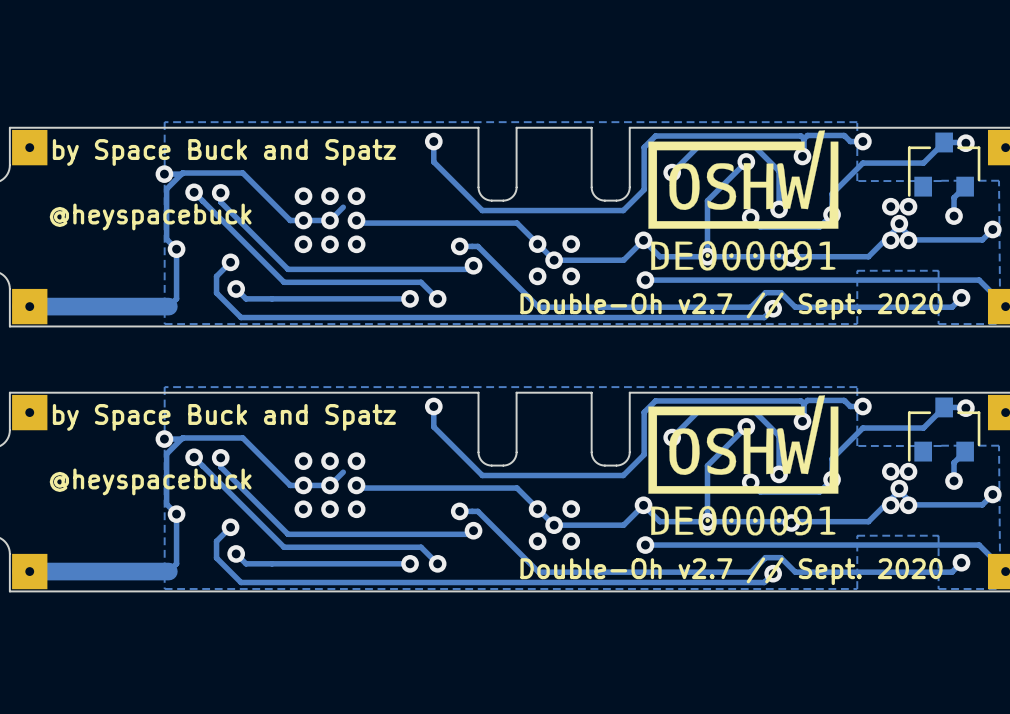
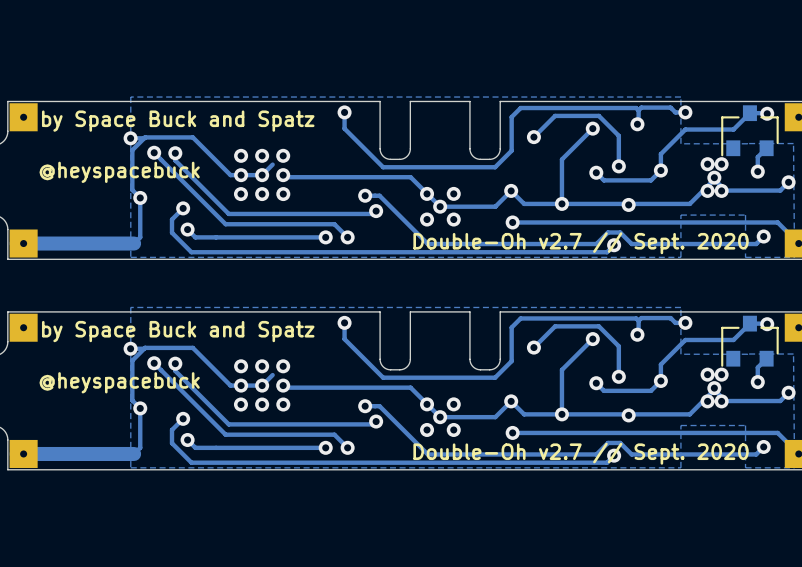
drawing: [648, 130, 839, 271] -> none
drawing: [648, 395, 839, 536] -> none

